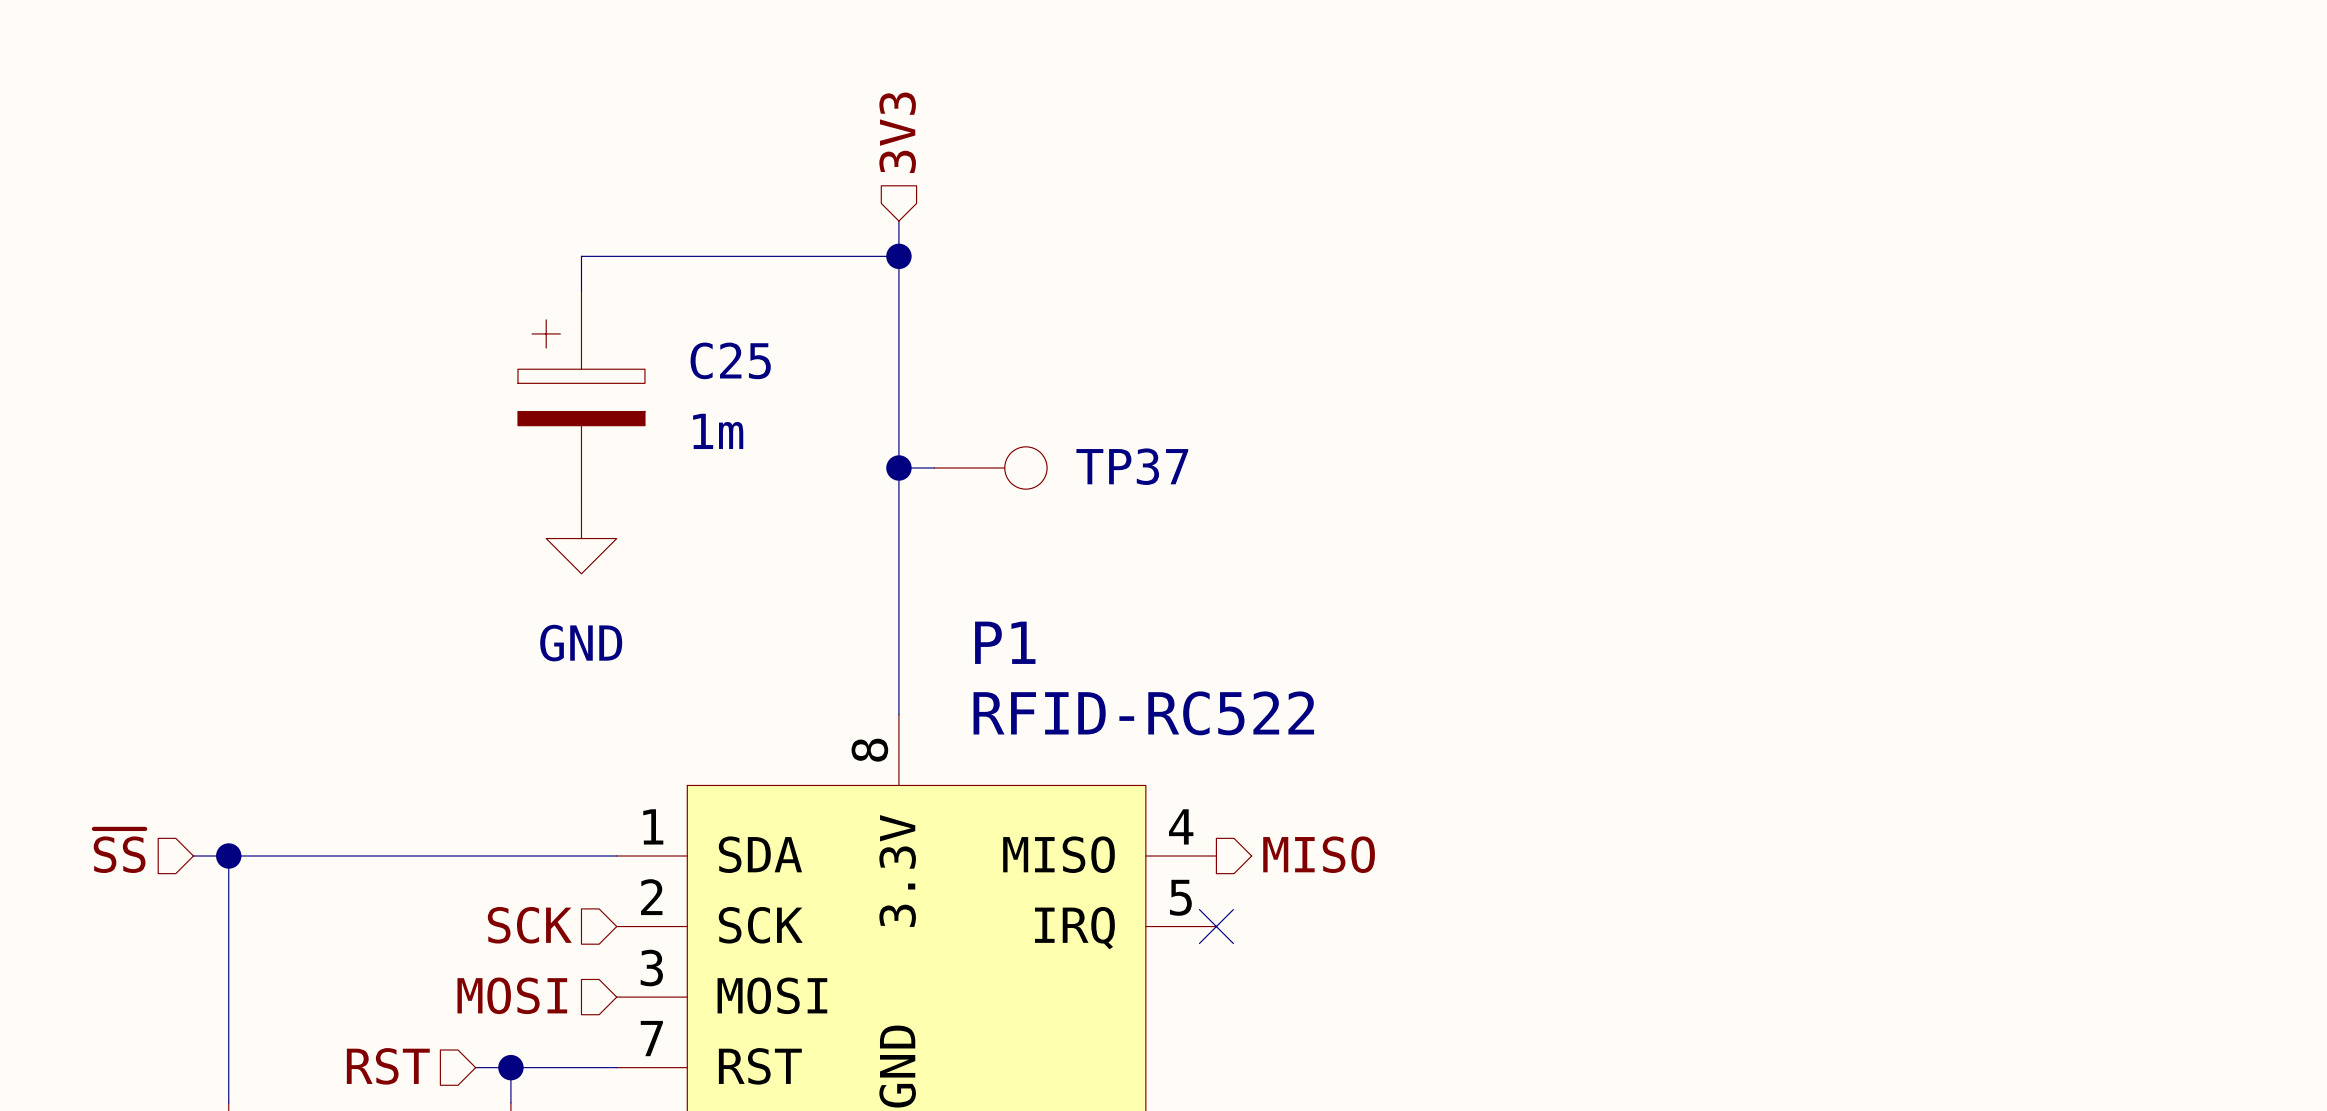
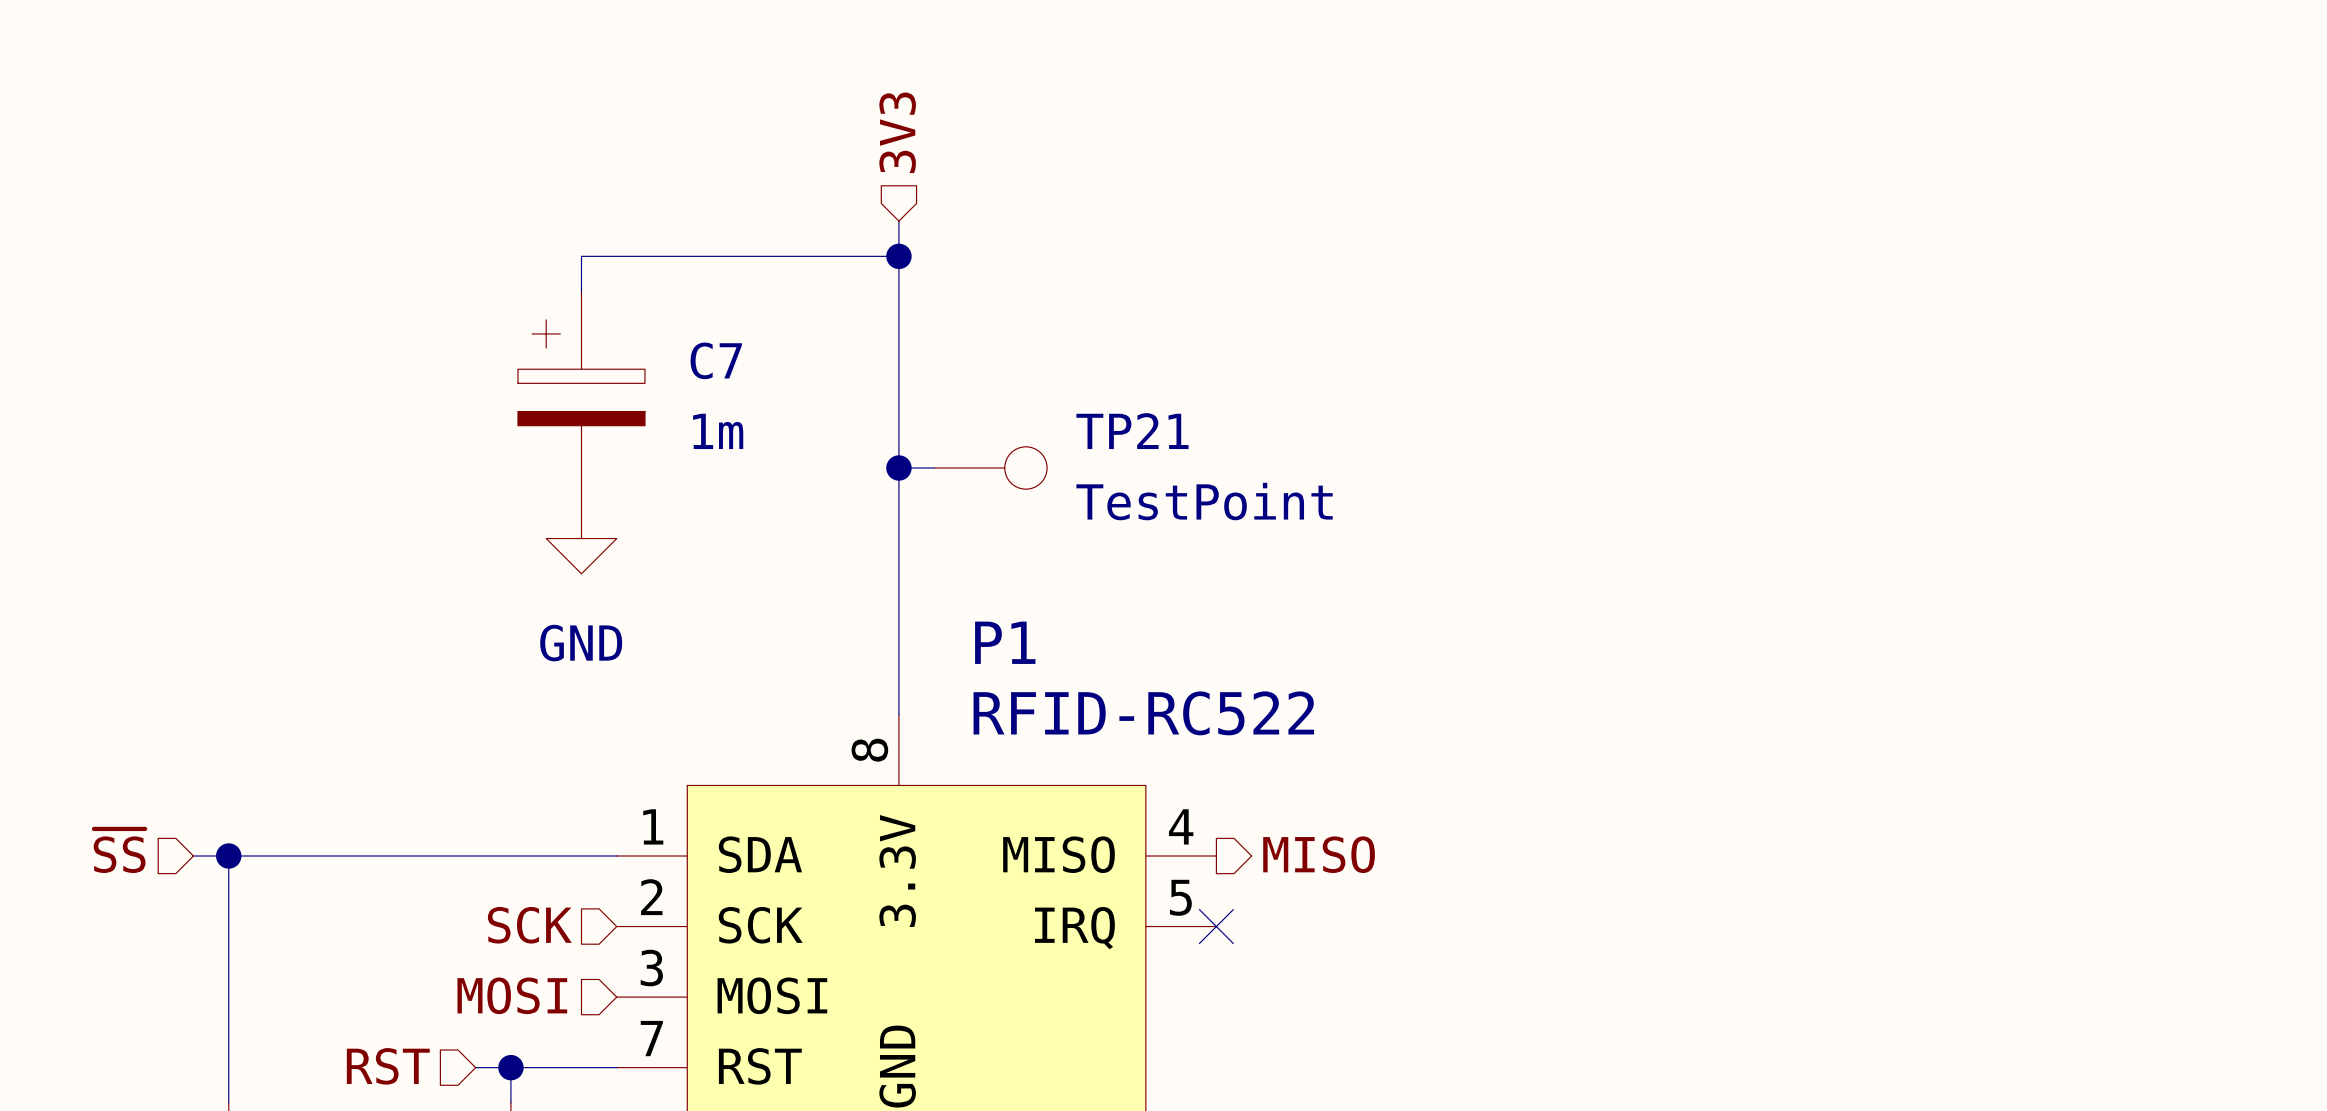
C25 name: C25 (730, 360) -> C7 (716, 360)
TP37 name: TP37 (1132, 466) -> TP21 (1132, 431)
TP37 value: none -> TestPoint (1204, 501)

